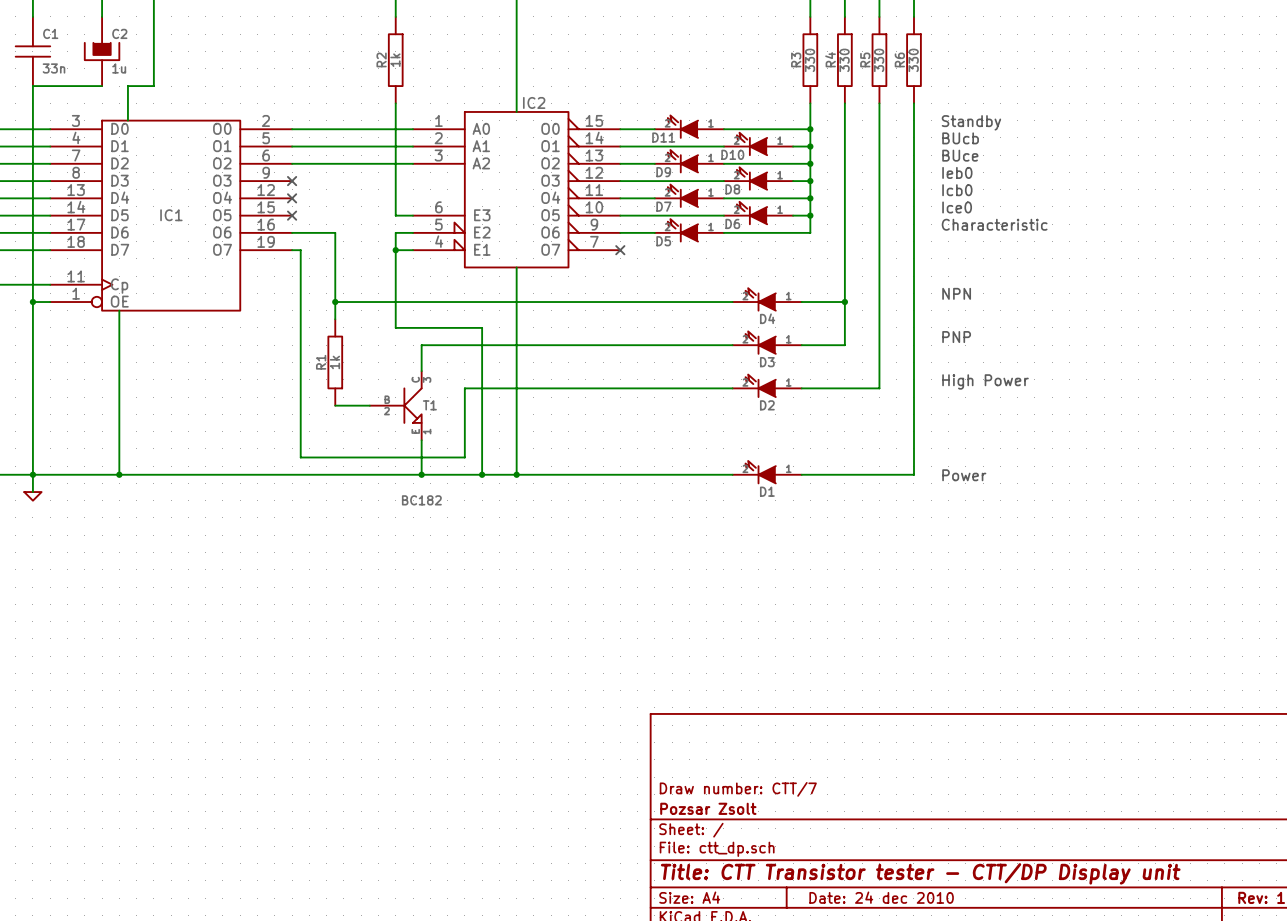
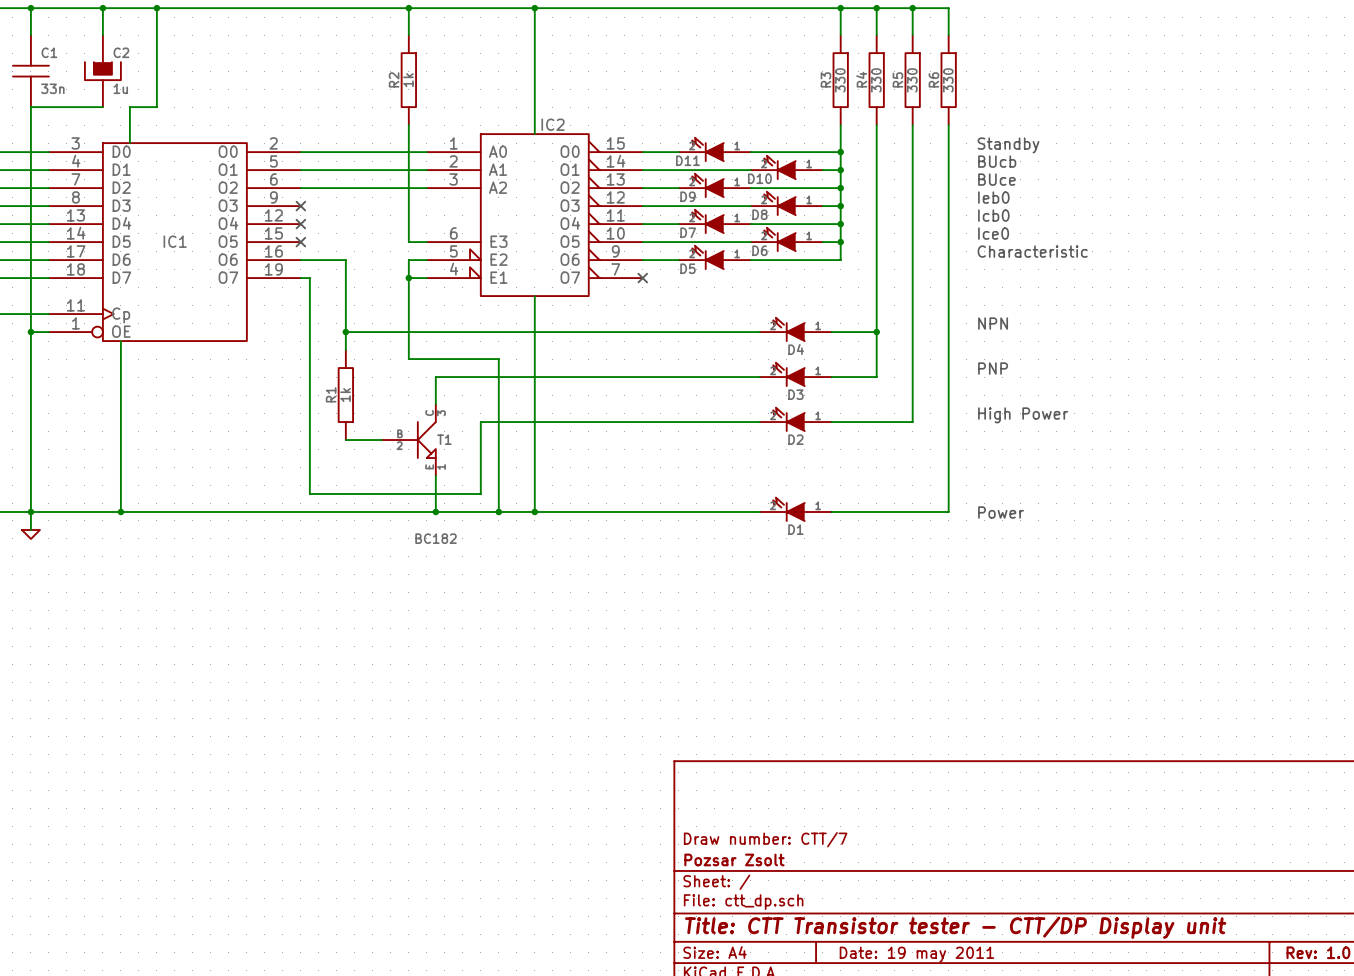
title block: Date: 24 dec 2010 (881, 897) -> Date: 19 may 2011 (916, 954)

